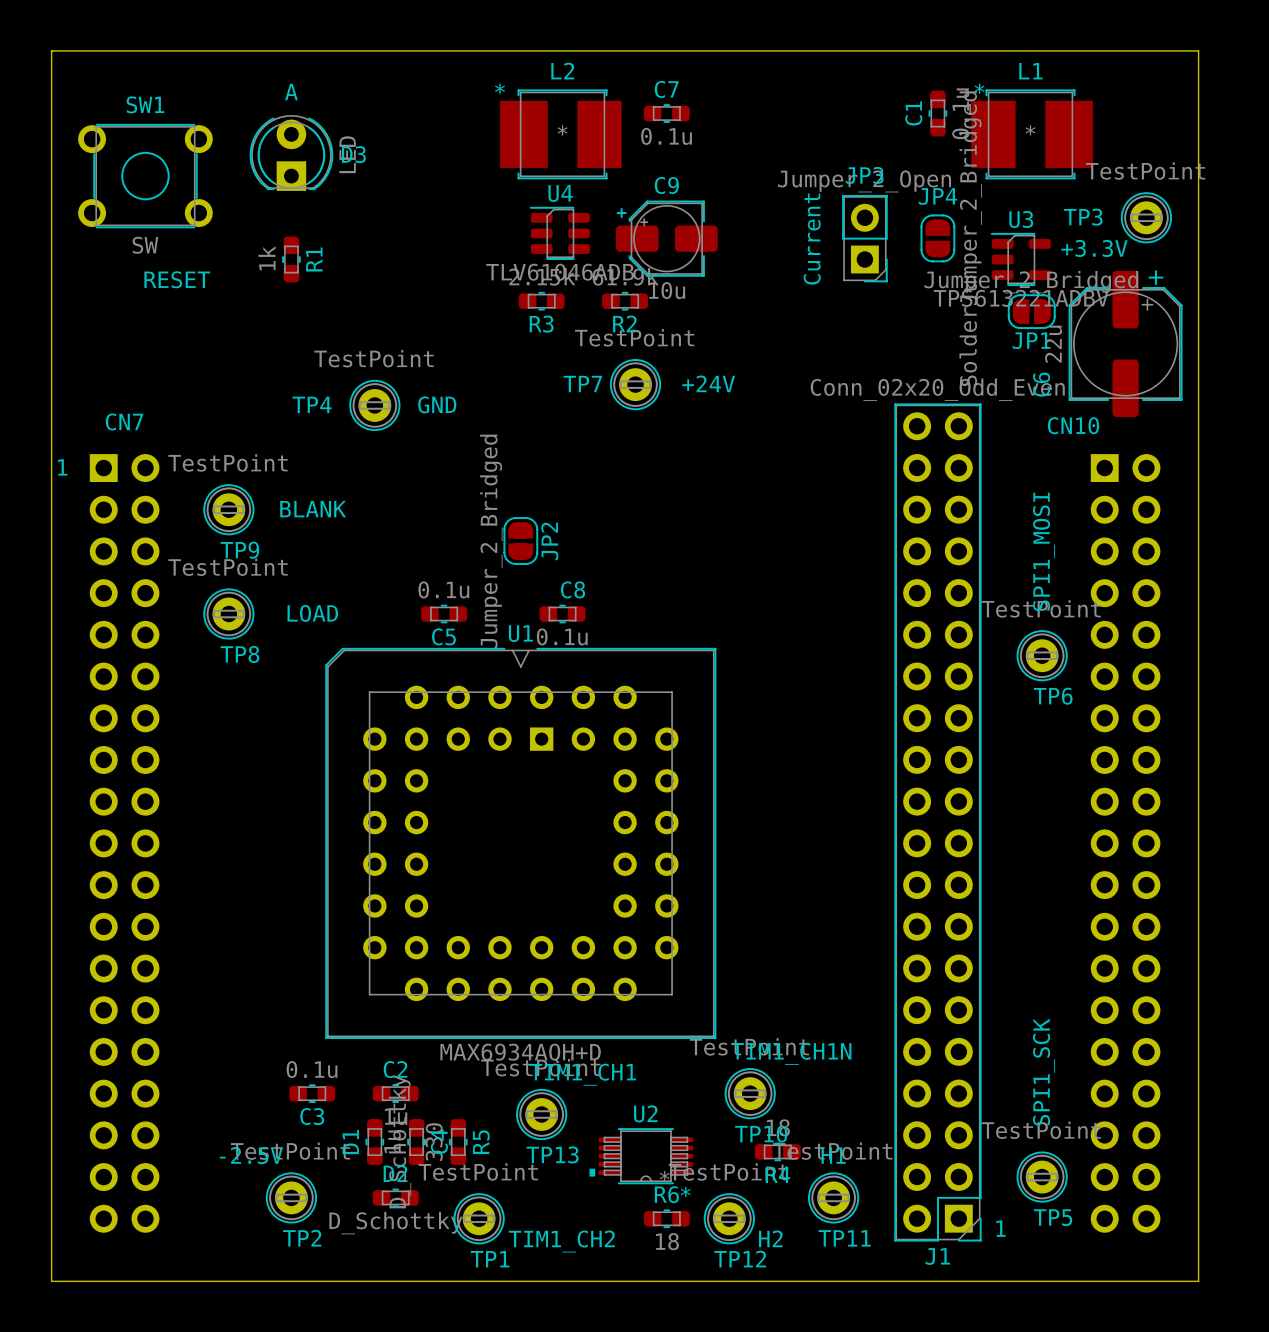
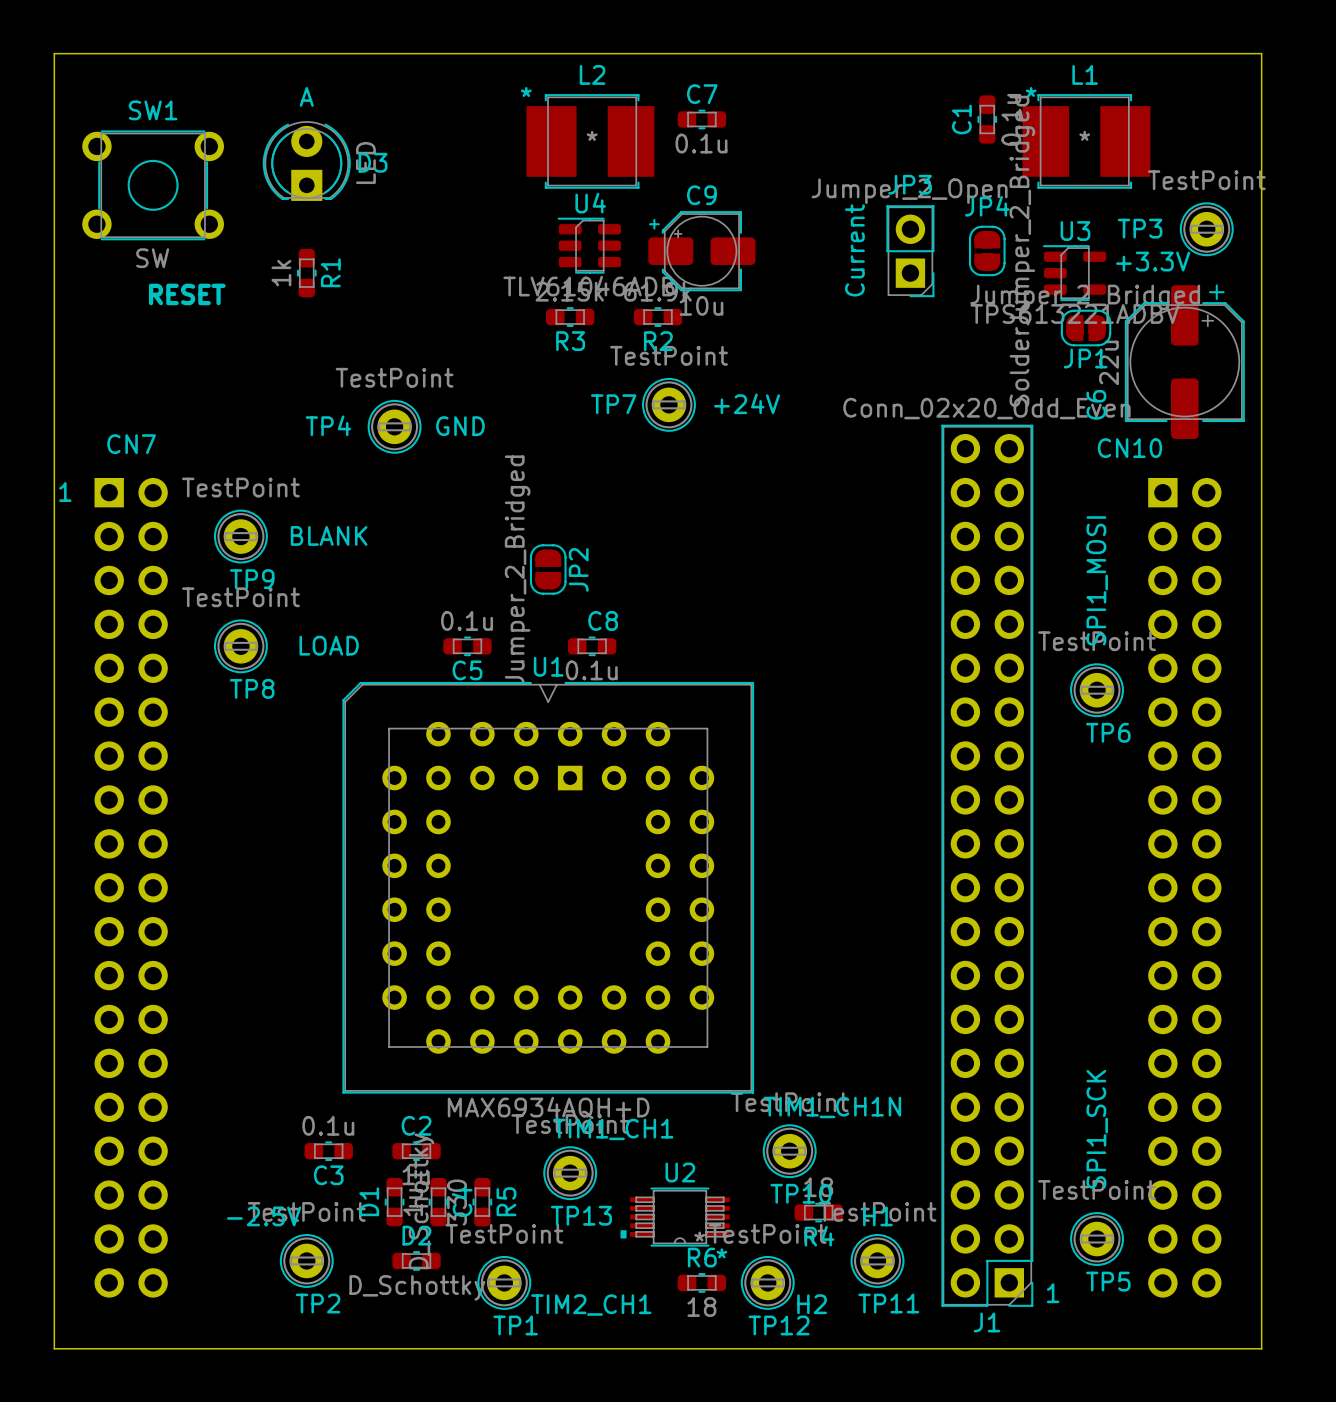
text: TIM1_CH2 (561, 1241) -> TIM2_CH1 (591, 1305)

